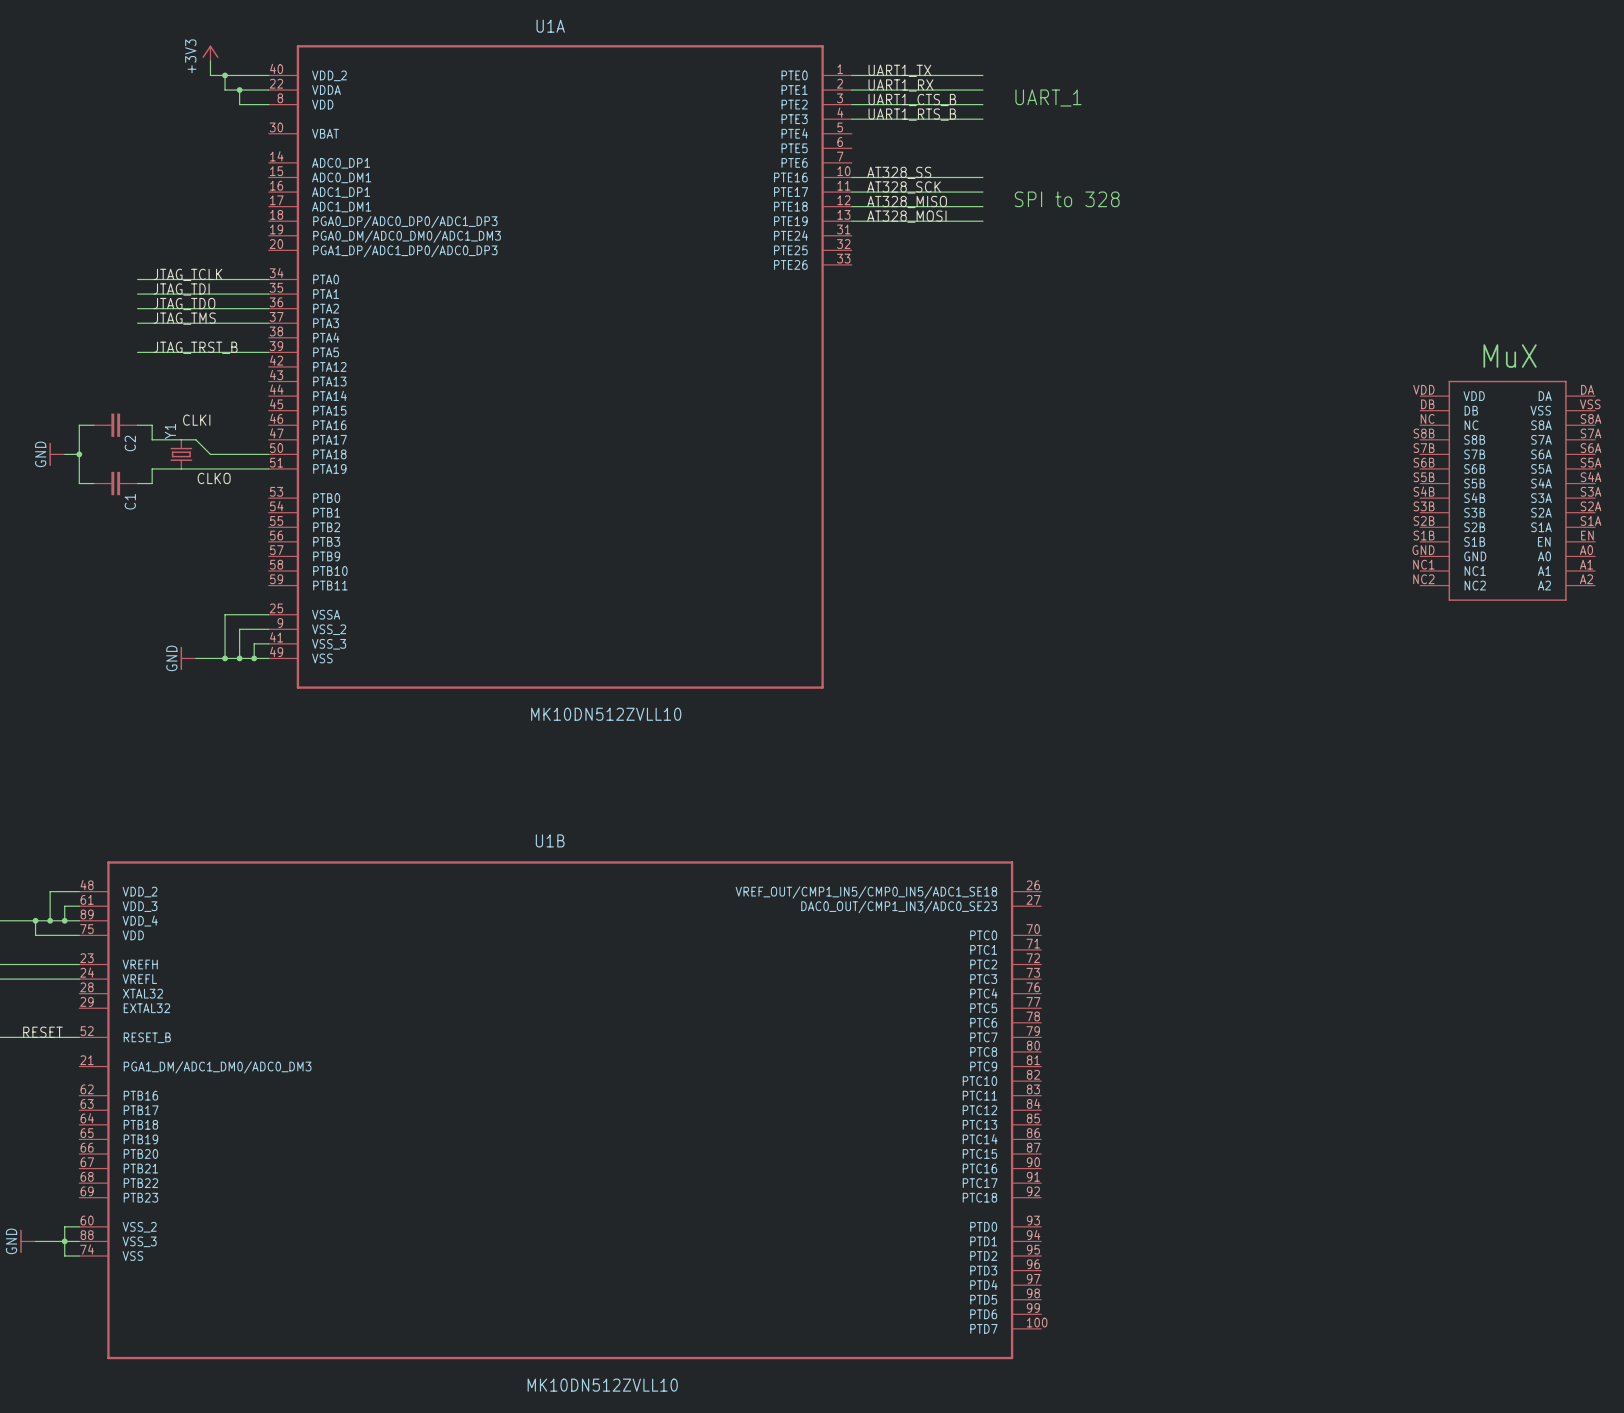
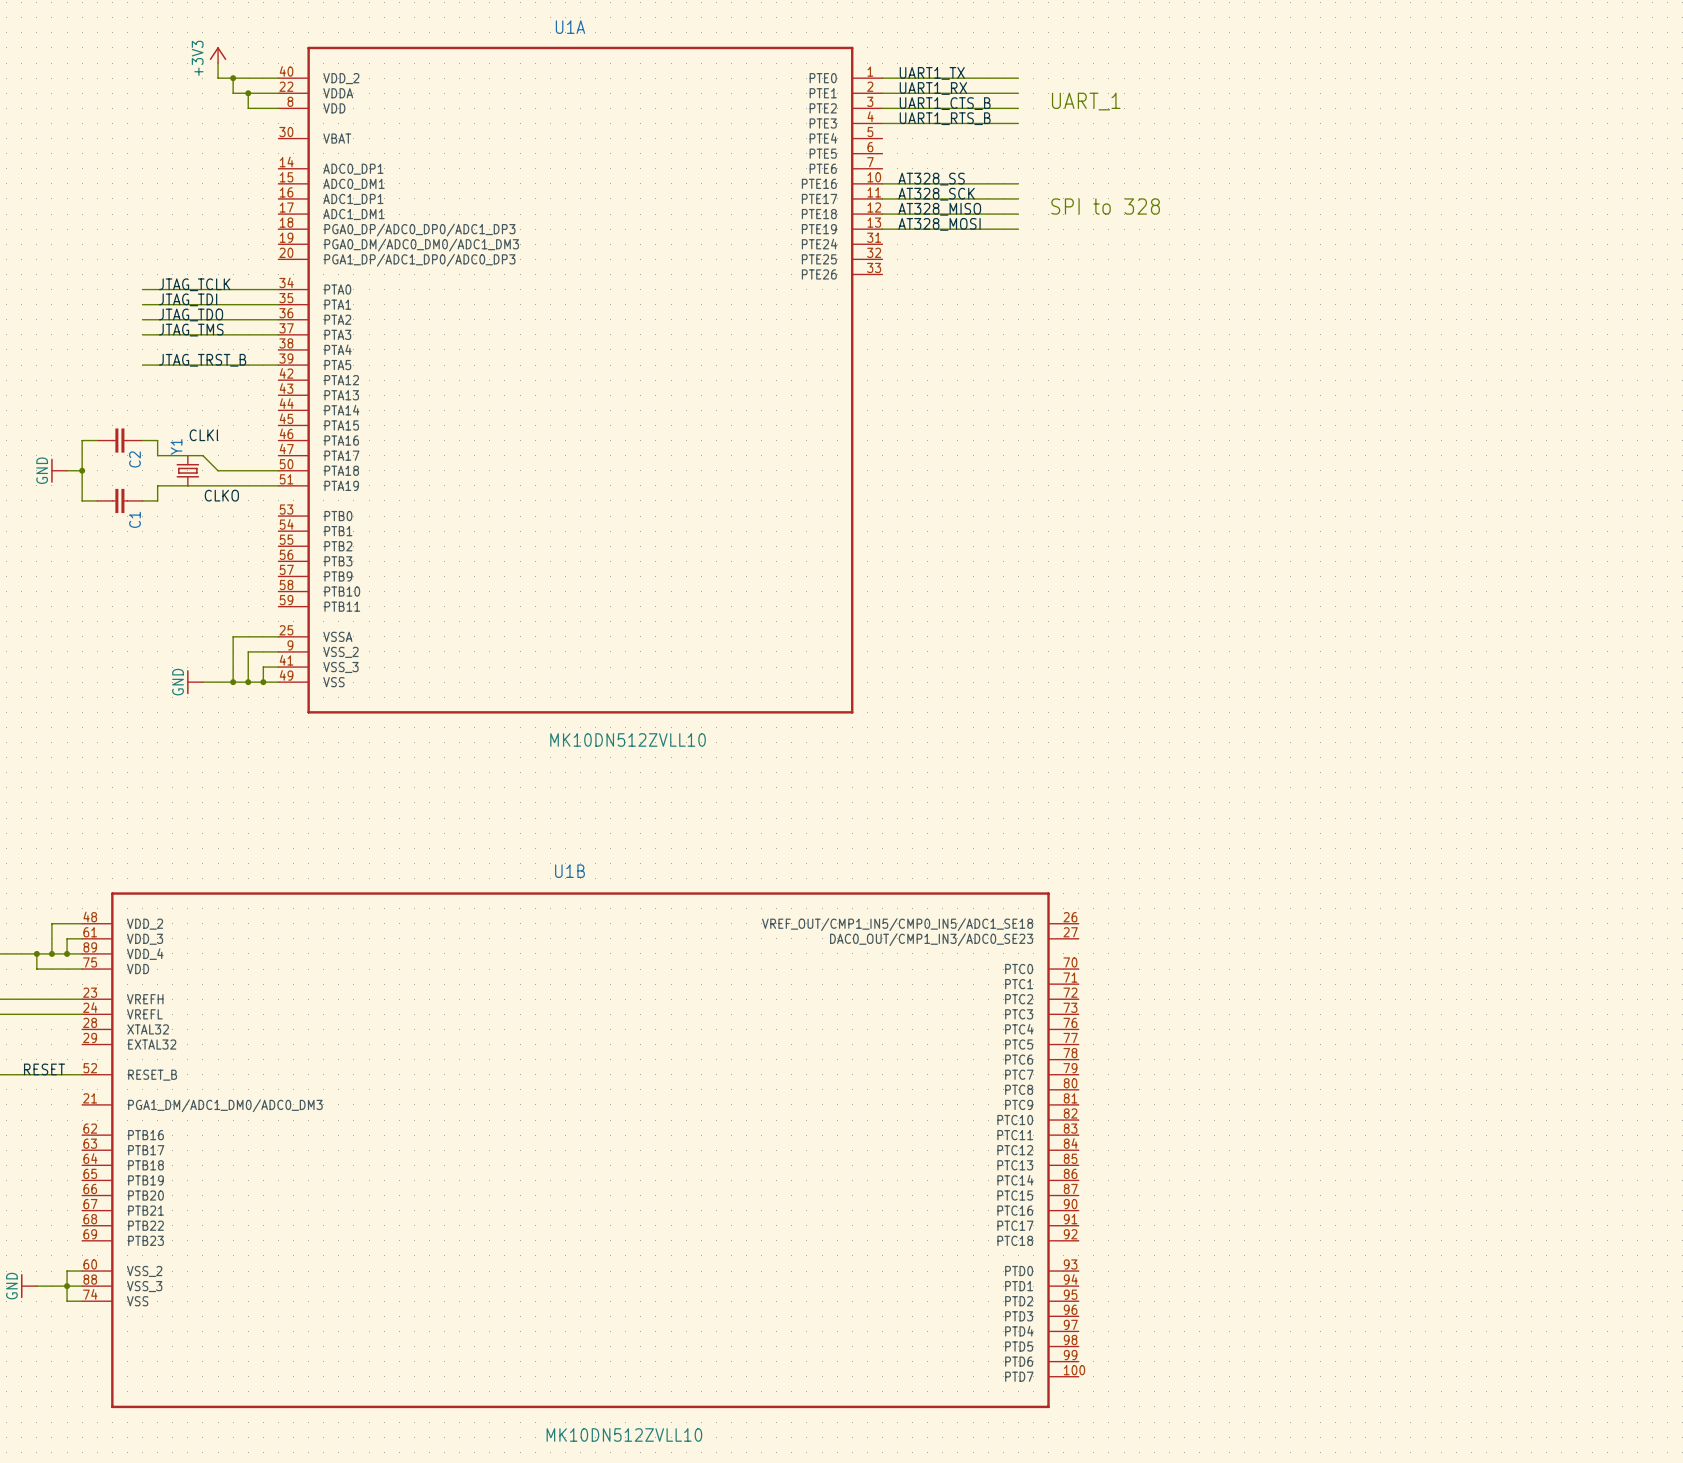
text: MuX (1510, 356) -> none
part: (1507, 490) -> none

